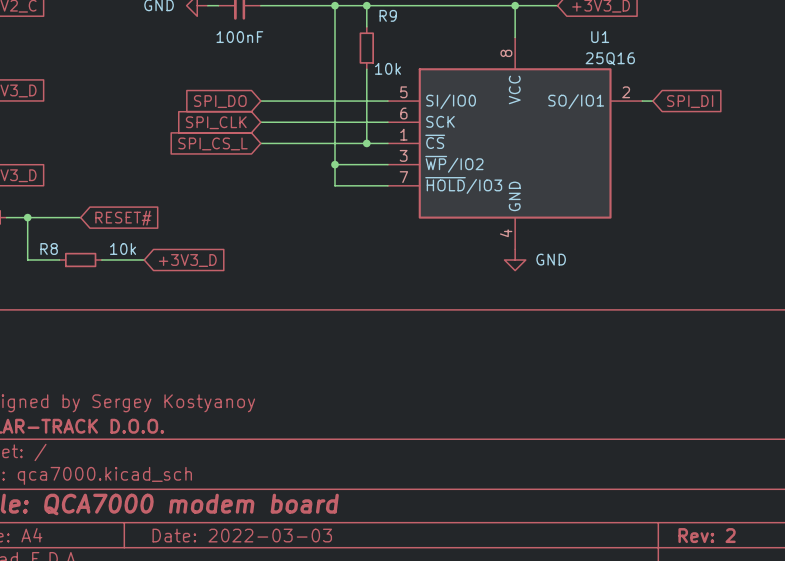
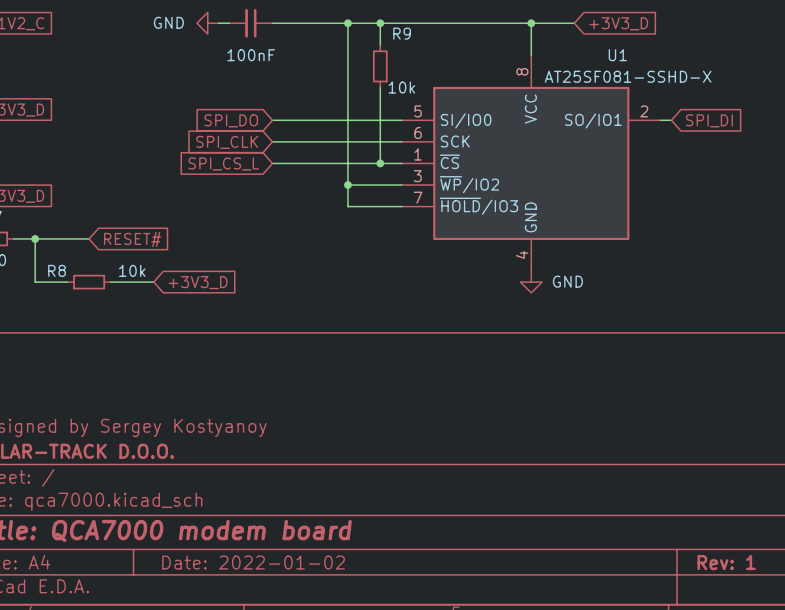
U1 value: 25Q16 (610, 58) -> AT25SF081-SSHD-X (628, 76)
title block: Date: 2022-03-03 (242, 535) -> Date: 2022-01-02 (253, 562)
title block: Rev: 2 (707, 535) -> Rev: 1 (726, 562)

